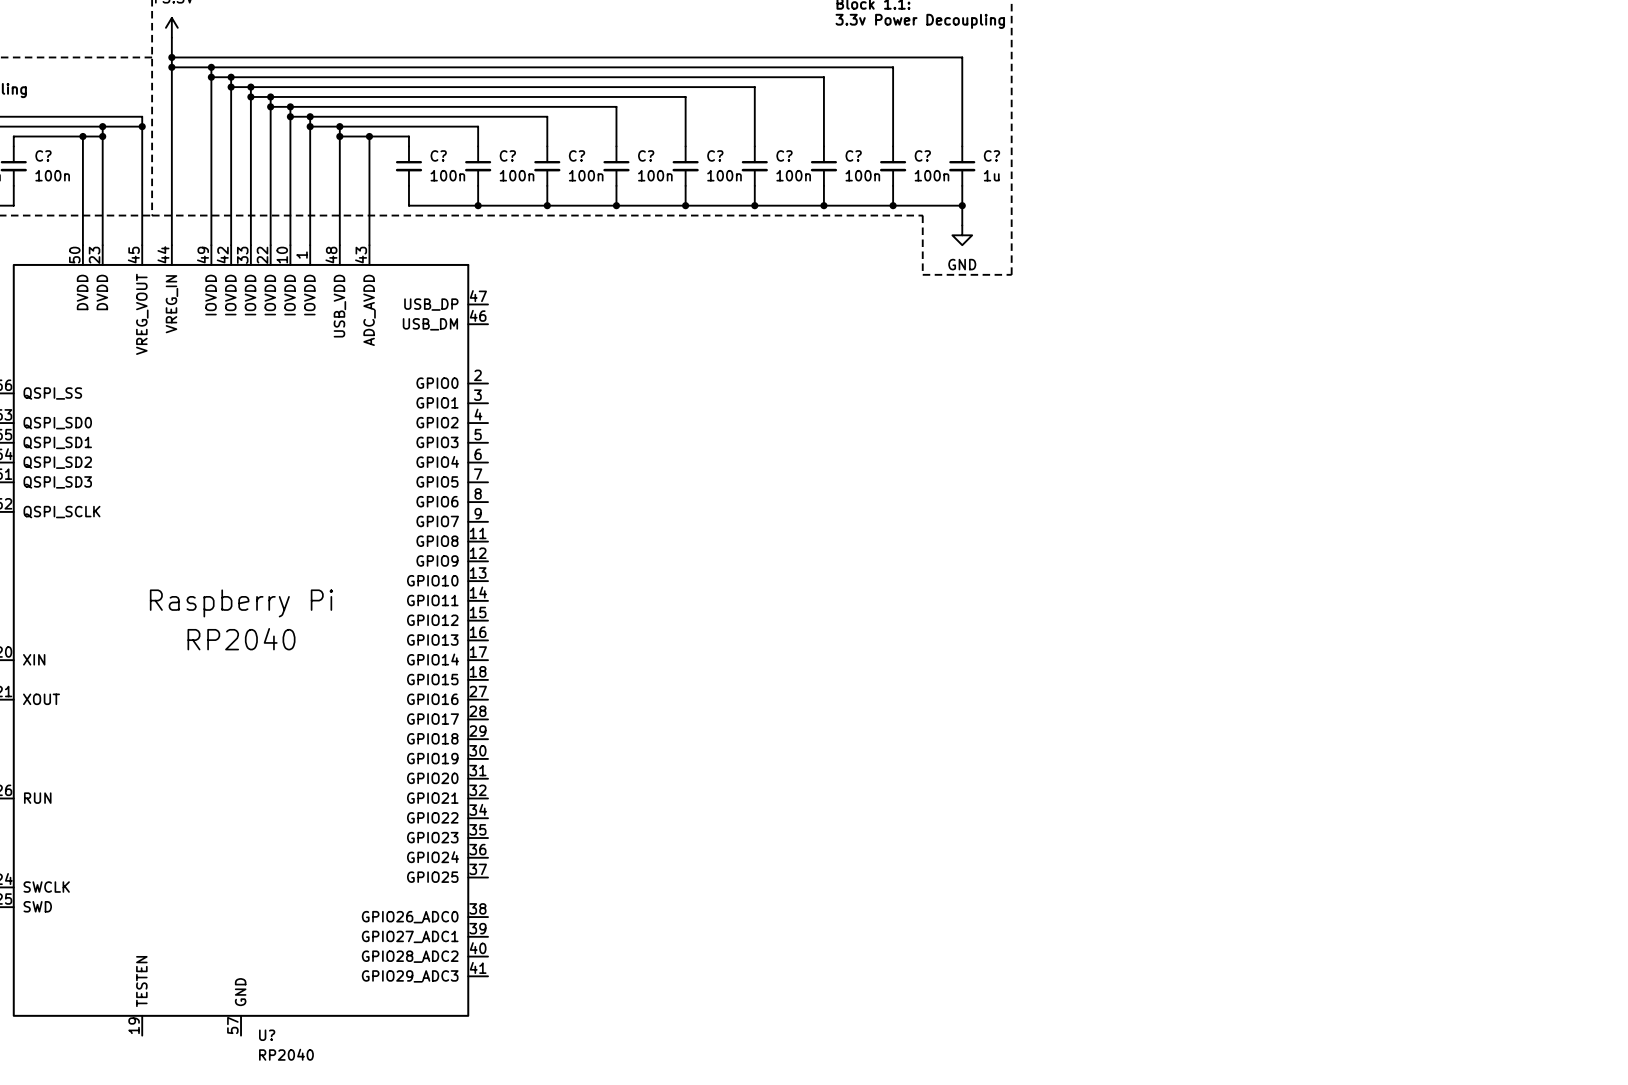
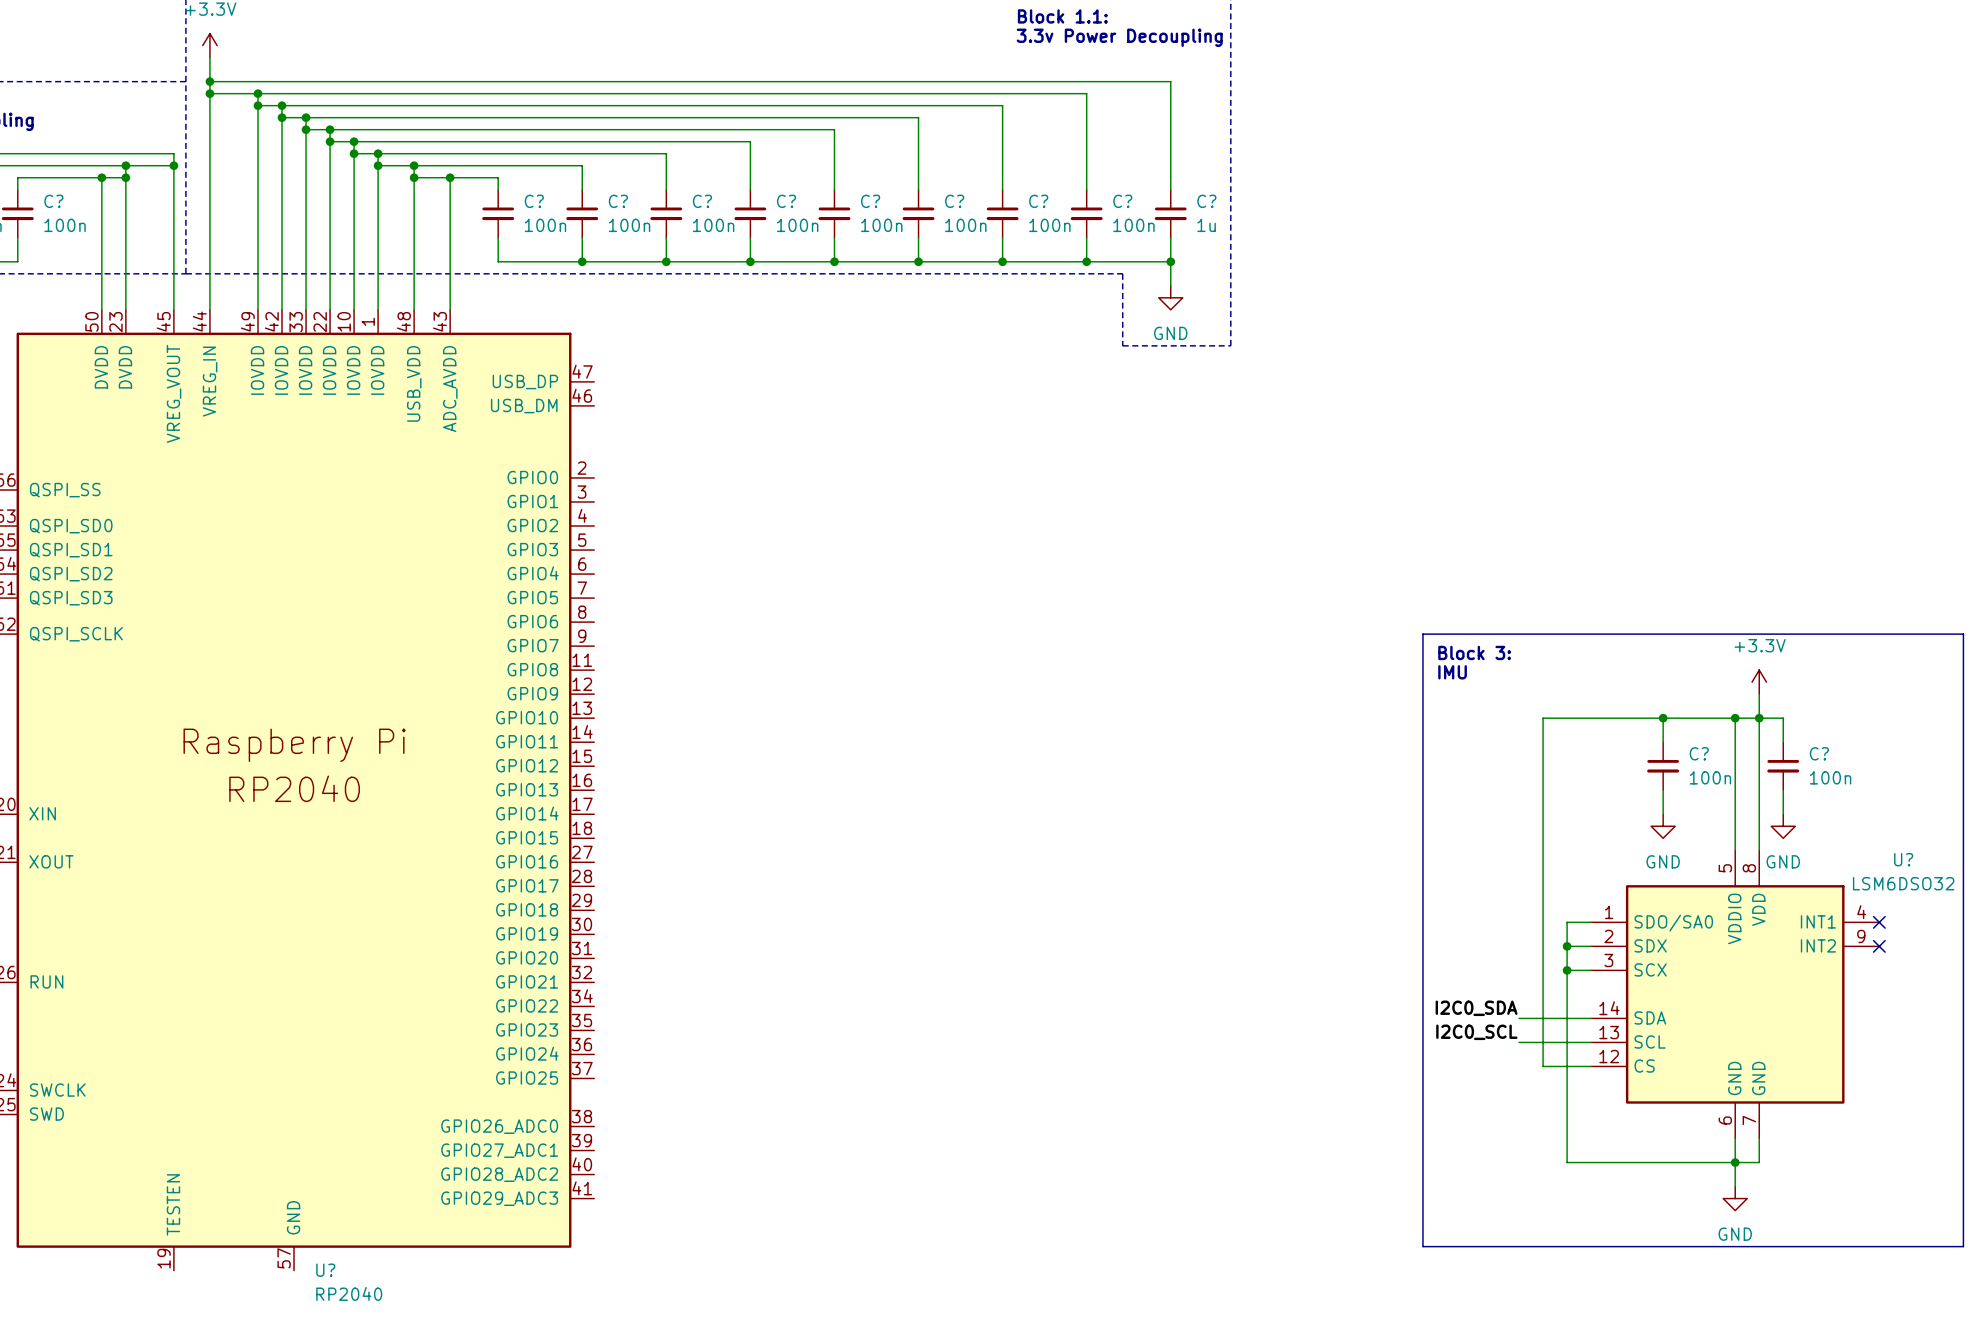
line: none -> (1422, 634) (1963, 634) (1963, 1246) (1422, 1246) (1422, 634)
text: none -> Block 3: (1474, 652)
text: none -> IMU (1452, 672)
power symbol: none -> +3.3V (1759, 682)
wire: none -> (1759, 694) (1759, 850)
wire: none -> (1663, 718) (1663, 742)
junction: none -> (1663, 718)
wire: none -> (1735, 718) (1735, 850)
junction: none -> (1735, 718)
junction: none -> (1759, 718)
wire: none -> (1783, 742) (1783, 718) (1543, 718) (1543, 1066) (1591, 1066)
C?: none -> 100n (1663, 766)
C?: none -> 100n (1783, 766)
wire: none -> (1663, 790) (1663, 814)
wire: none -> (1783, 790) (1783, 814)
power symbol: none -> GND (1663, 826)
power symbol: none -> GND (1783, 826)
wire: none -> (1591, 922) (1567, 922) (1567, 1162) (1759, 1162) (1759, 1138)
no-connect mark: none -> (1879, 922)
wire: none -> (1567, 946) (1591, 946)
junction: none -> (1567, 946)
no-connect mark: none -> (1879, 946)
wire: none -> (1567, 970) (1591, 970)
junction: none -> (1567, 970)
U?: none -> LSM6DSO32 (1735, 994)
label: none -> I2C0_SDA (1476, 1008)
wire: none -> (1519, 1018) (1591, 1018)
label: none -> I2C0_SCL (1476, 1032)
wire: none -> (1519, 1042) (1591, 1042)
wire: none -> (1735, 1138) (1735, 1186)
junction: none -> (1735, 1162)
power symbol: none -> GND (1735, 1198)

